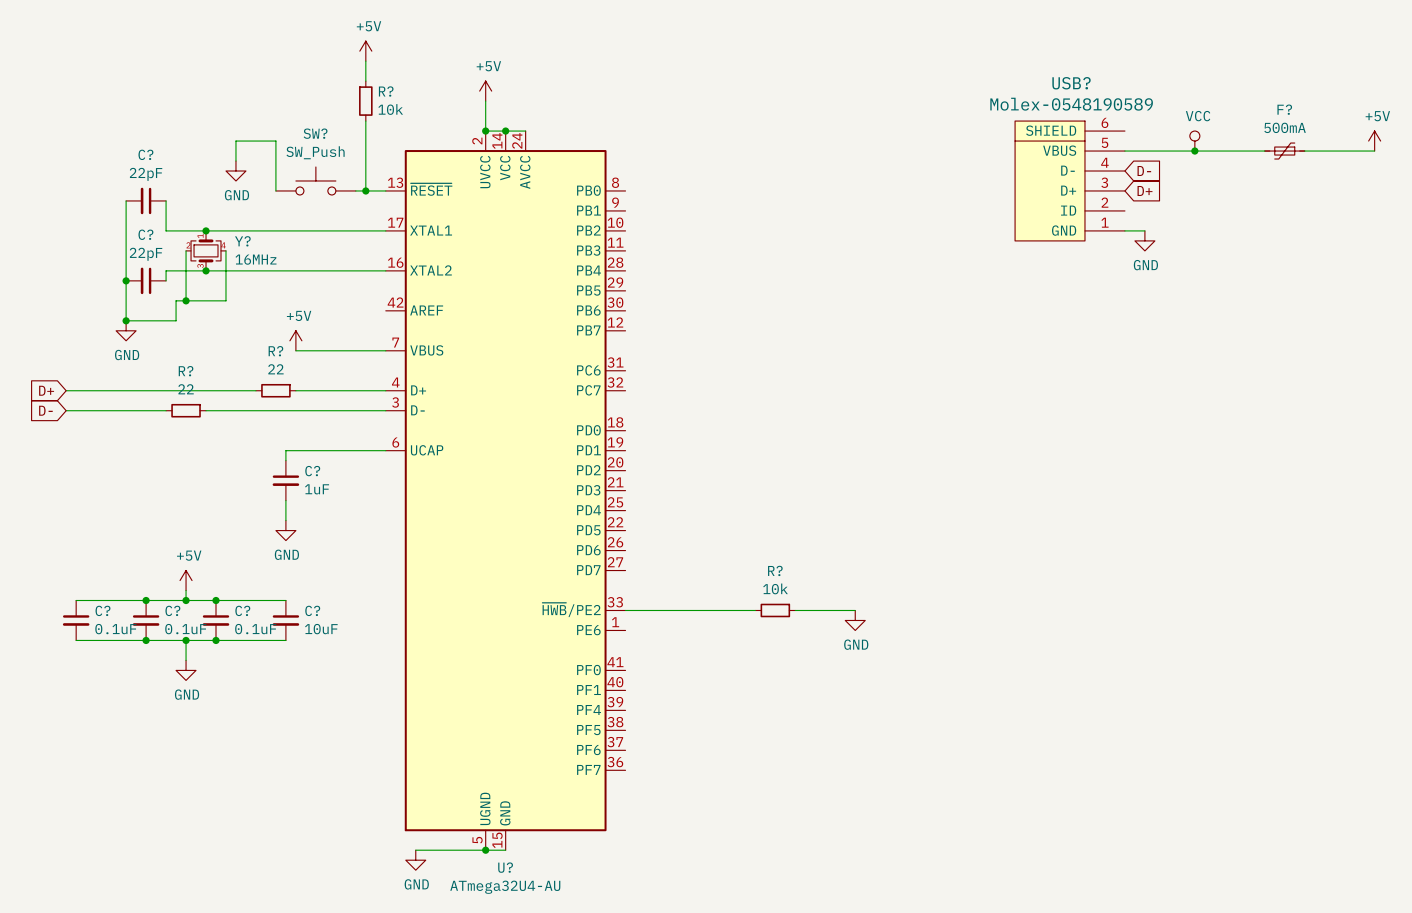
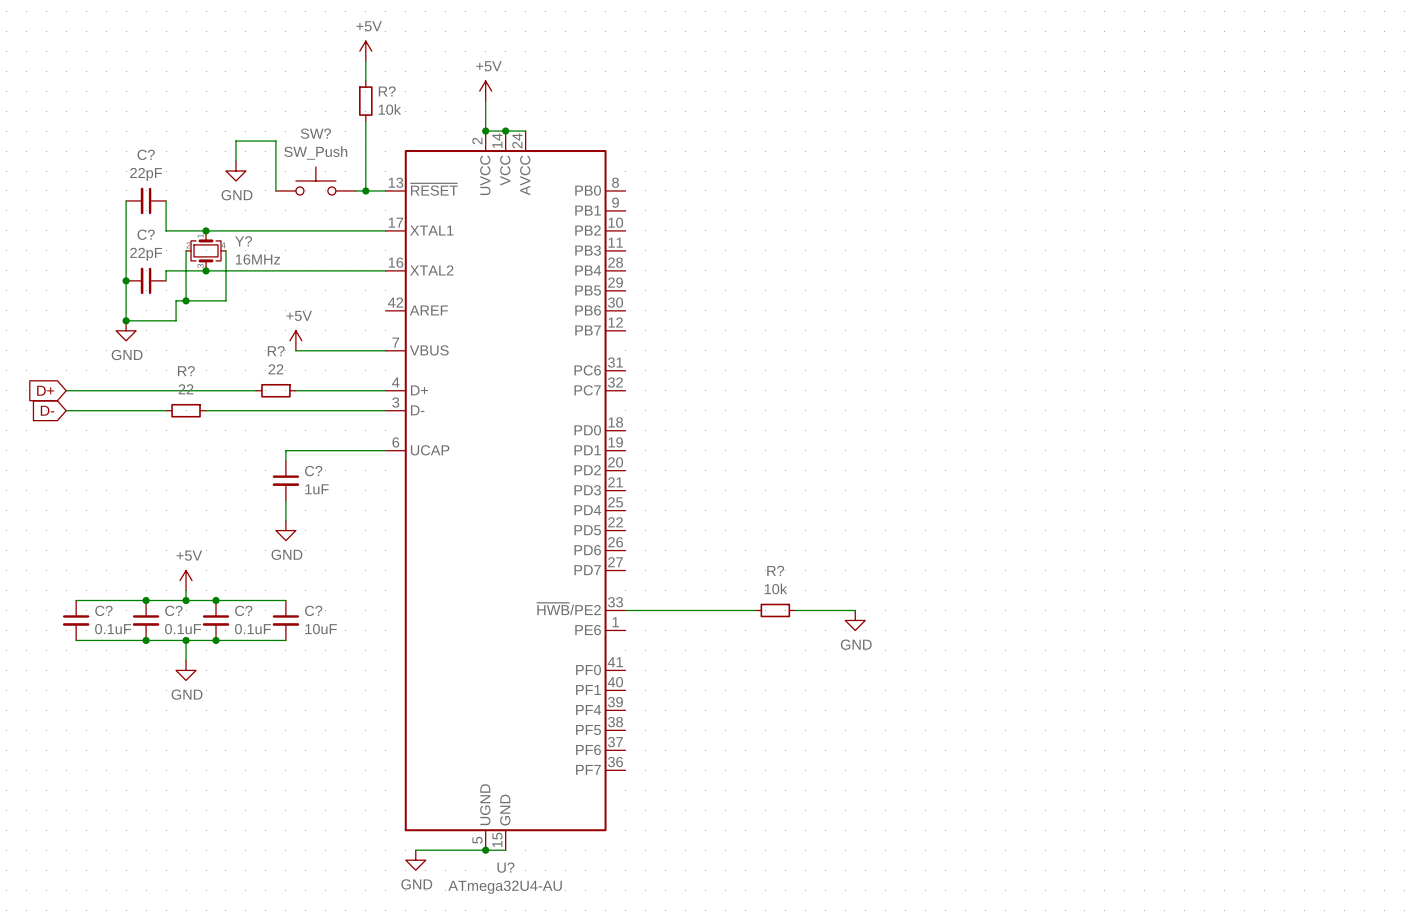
power symbol: VCC (1194, 141) -> none
power symbol: +5V (1374, 141) -> none
wire: (1124, 151) (1264, 151) -> none
junction: (1194, 151) -> none
F?: 500mA (1284, 151) -> none
wire: (1304, 151) (1374, 151) -> none
global label: D- (1144, 171) -> none
USB?: Molex-0548190589 (1070, 180) -> none
global label: D+ (1144, 190) -> none
wire: (1124, 230) (1144, 230) -> none
power symbol: GND (1144, 240) -> none

